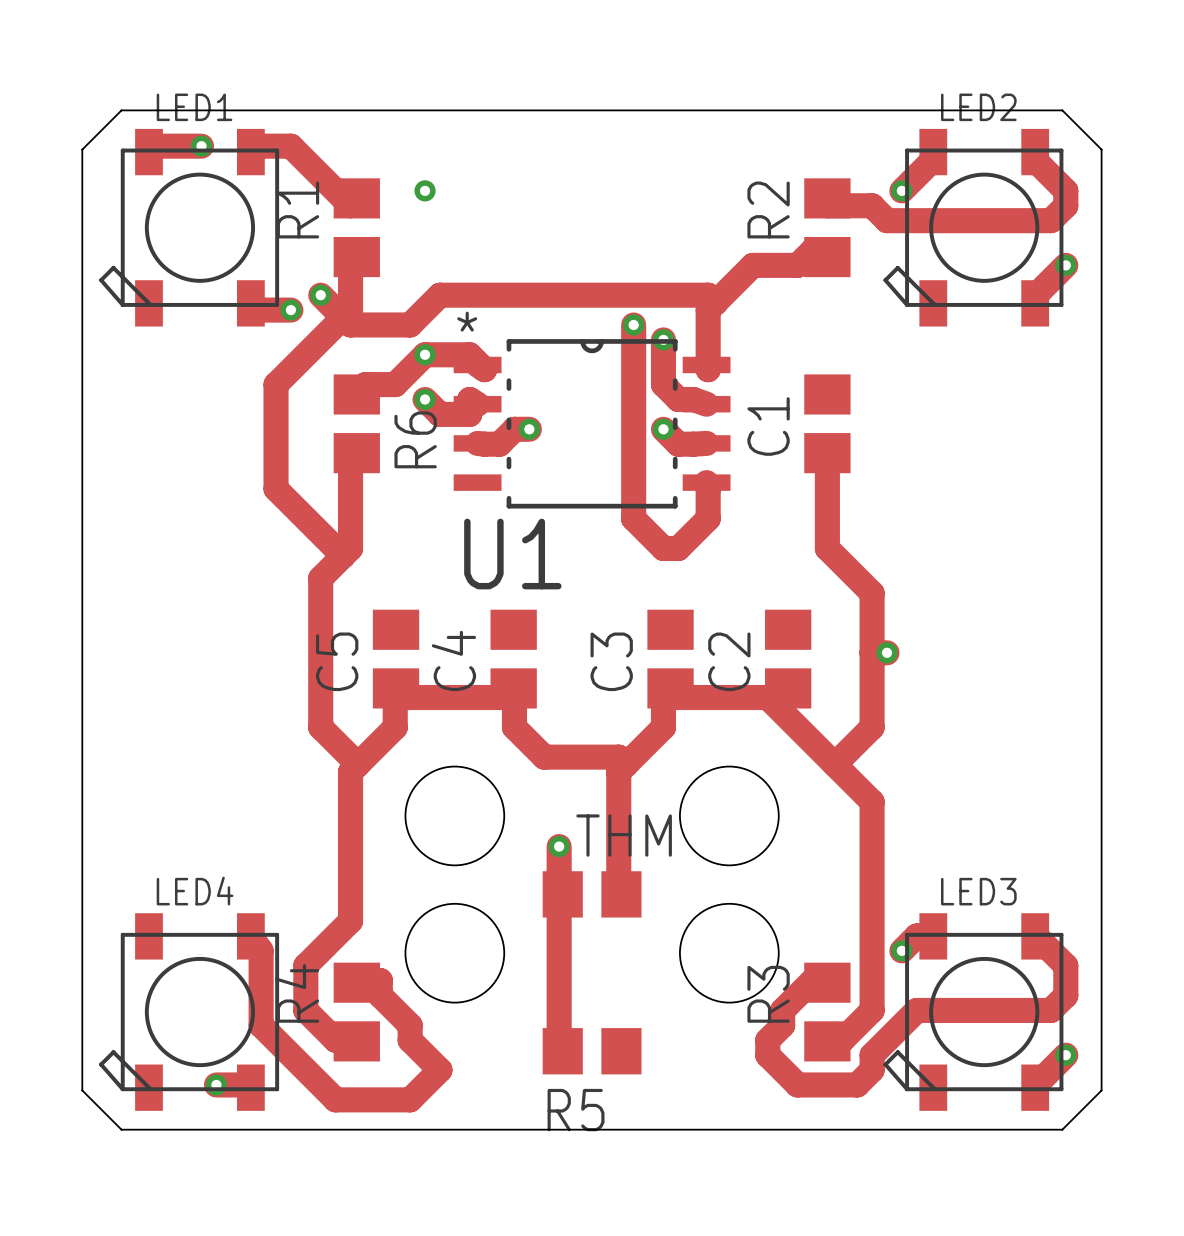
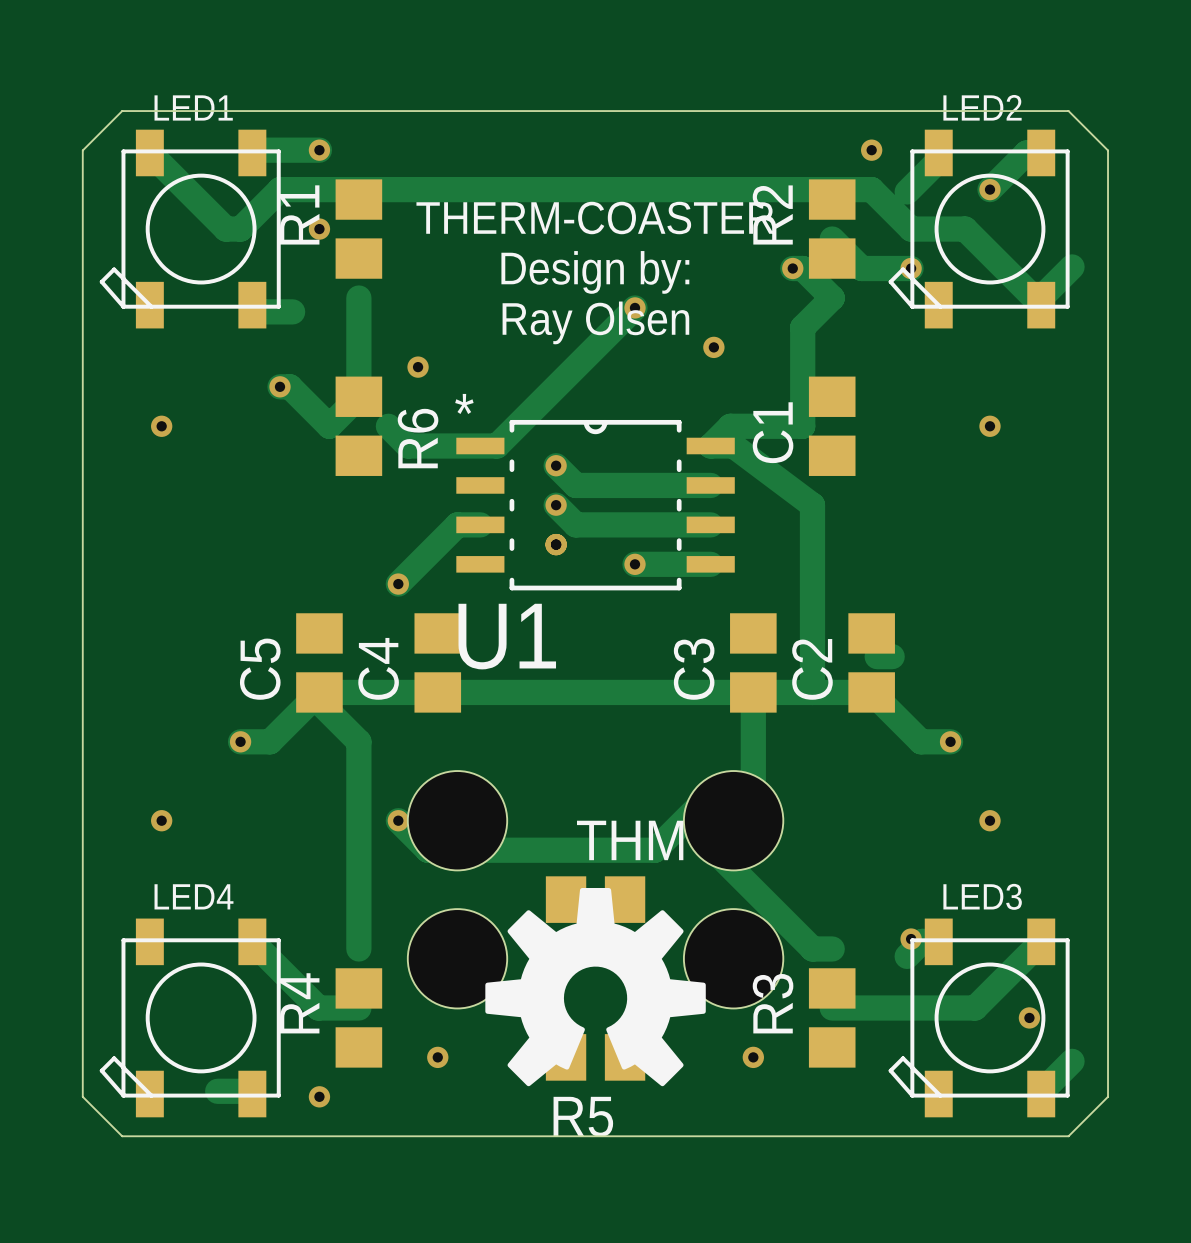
track: (201, 146) (156, 146) (149, 152) -> (1041, 305) (965, 229) (911, 229) (871, 189) (280, 189) (240, 229) (225, 229) (149, 152)
via: (201, 146) -> none
via: none -> (319, 150)
via: none -> (871, 150)
track: (250, 152) (261, 146) (290, 146) (350, 205) (356, 198) -> (252, 152) (255, 150) (319, 150)
track: (1035, 152) (1036, 161) (1065, 190) (1065, 205) (1050, 220) (886, 220) (872, 205) (827, 205) (827, 198) -> (1041, 152) (1026, 152) (989, 189)
via: none -> (989, 189)
via: (425, 190) -> none
via: (901, 190) -> none
text: none -> THERM-COASTER (595, 218)
via: none -> (319, 229)
track: none -> (832, 239) (861, 268) (911, 268)
track: (356, 257) (350, 265) (350, 310) (276, 384) (276, 488) (343, 555) -> none
track: (827, 257) (827, 250) (812, 250) (797, 265) (752, 265) (708, 310) (708, 369) (706, 364) -> none
via: (1065, 265) -> none
track: none -> (792, 268) (802, 268) (832, 298) (802, 327) (802, 426) (730, 426) (710, 446) (733, 446) (812, 505) (812, 692)
via: none -> (792, 268)
via: none -> (911, 268)
text: none -> Design by: (595, 272)
track: (320, 295) (350, 324) (410, 324) (439, 295) (708, 295) (715, 302) -> none
via: (320, 295) -> none
track: none -> (358, 298) (358, 396) (329, 426) (289, 386) (280, 386)
track: none -> (635, 307) (496, 446) (408, 446) (388, 426)
via: (290, 310) -> none
text: none -> Ray Olsen (595, 322)
track: (633, 324) (633, 518) (663, 548) (678, 548) (708, 518) (706, 482) -> (556, 465) (575, 485) (710, 485)
via position: (633, 324) -> (635, 307)
track: (663, 339) (663, 384) (678, 399) (693, 399) (706, 404) -> none
via: (663, 339) -> none
via: none -> (713, 347)
via position: (425, 354) -> (418, 367)
track: (477, 364) (484, 369) (469, 354) (425, 354) (395, 384) (365, 384) (356, 394) -> none
via: none -> (280, 386)
track: (425, 399) (439, 414) (469, 414) (469, 399) (477, 404) -> none
via: (425, 399) -> none
via: none -> (161, 426)
U1 position: (592, 423) -> (595, 505)
via: none -> (989, 426)
track: (529, 429) (514, 429) (499, 444) (477, 443) -> none
via: (529, 429) -> none
track: (663, 429) (678, 444) (706, 443) -> none
via: (663, 429) -> none
track: (356, 453) (350, 459) (350, 548) (320, 578) (320, 727) (357, 764) -> none
track: (827, 453) (827, 548) (872, 593) (872, 727) (834, 764) -> none
via: none -> (556, 465)
track: none -> (556, 505) (575, 524) (710, 524)
via: none -> (556, 505)
track: none -> (480, 524) (457, 524) (398, 584)
via: none -> (556, 544)
track: none -> (635, 564) (710, 564)
via: none -> (635, 564)
via: none -> (398, 584)
via: (886, 652) -> none
C5 position: (396, 659) -> (319, 662)
C4 position: (513, 659) -> (437, 662)
C3 position: (670, 659) -> (753, 662)
C2 position: (788, 659) -> (871, 662)
track: none -> (753, 692) (753, 810) (713, 850) (812, 948) (832, 948)
track: none -> (319, 702) (358, 741) (358, 948)
track: none -> (240, 741) (270, 741) (319, 692) (871, 692) (921, 741) (950, 741)
via: none -> (240, 741)
via: none -> (950, 741)
track: (626, 764) (618, 757) (544, 757) (514, 727) (513, 688) (499, 697) (410, 697) (396, 688) (395, 727) (350, 772) (350, 921) (305, 965) (305, 1010) (335, 1040) (356, 1041) -> none
track: none -> (713, 791) (654, 850) (427, 850) (398, 820)
via: none -> (161, 820)
via: none -> (398, 820)
via: none -> (989, 820)
track: (559, 846) (559, 891) (562, 894) (559, 906) (559, 1040) (562, 1051) -> none
via: (559, 846) -> none
drawing: none -> [485, 887, 706, 1087]
track: (621, 894) (618, 891) (618, 772) (663, 727) (663, 697) (670, 688) (678, 697) (782, 697) (788, 688) (767, 697) (872, 801) (872, 1010) (842, 1040) (827, 1041) -> none
track: (250, 936) (261, 950) (261, 1025) (335, 1099) (410, 1099) (439, 1070) (410, 1040) (410, 1025) (380, 995) (380, 980) (356, 982) -> (252, 941) (318, 1008) (358, 1008)
track: (1035, 936) (1065, 965) (1065, 995) (1050, 1010) (916, 1010) (872, 1055) (872, 1070) (857, 1084) (797, 1084) (767, 1055) (767, 1040) (782, 1025) (782, 1010) (812, 980) (827, 980) (827, 982) -> (1041, 941) (975, 1008) (832, 1008)
via position: (901, 950) -> (911, 939)
via: none -> (437, 1057)
via: none -> (753, 1057)
via position: (1065, 1055) -> (1029, 1017)
via position: (216, 1084) -> (319, 1096)

